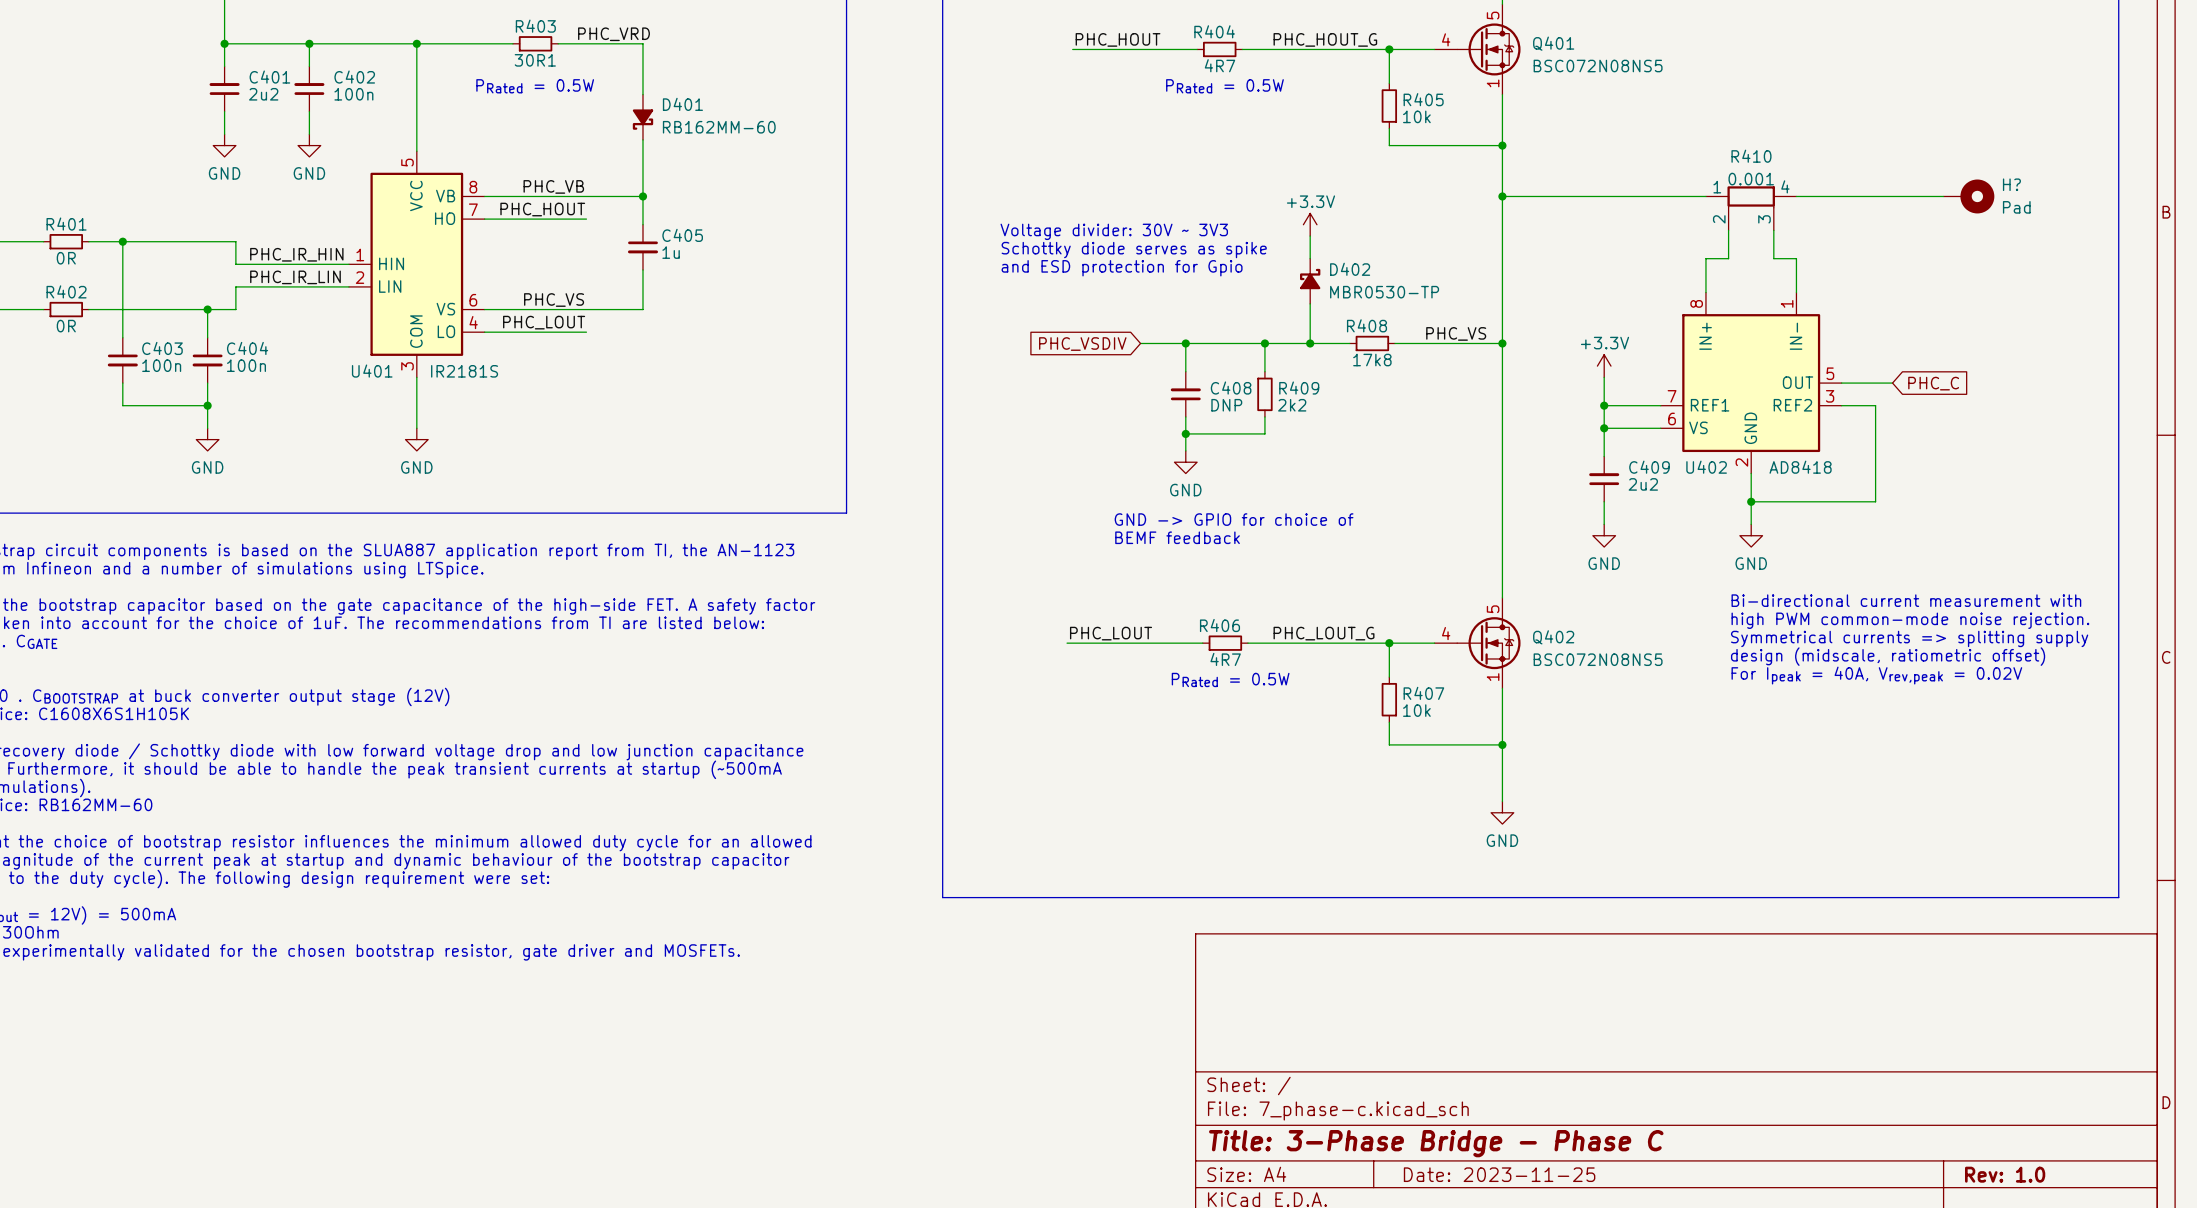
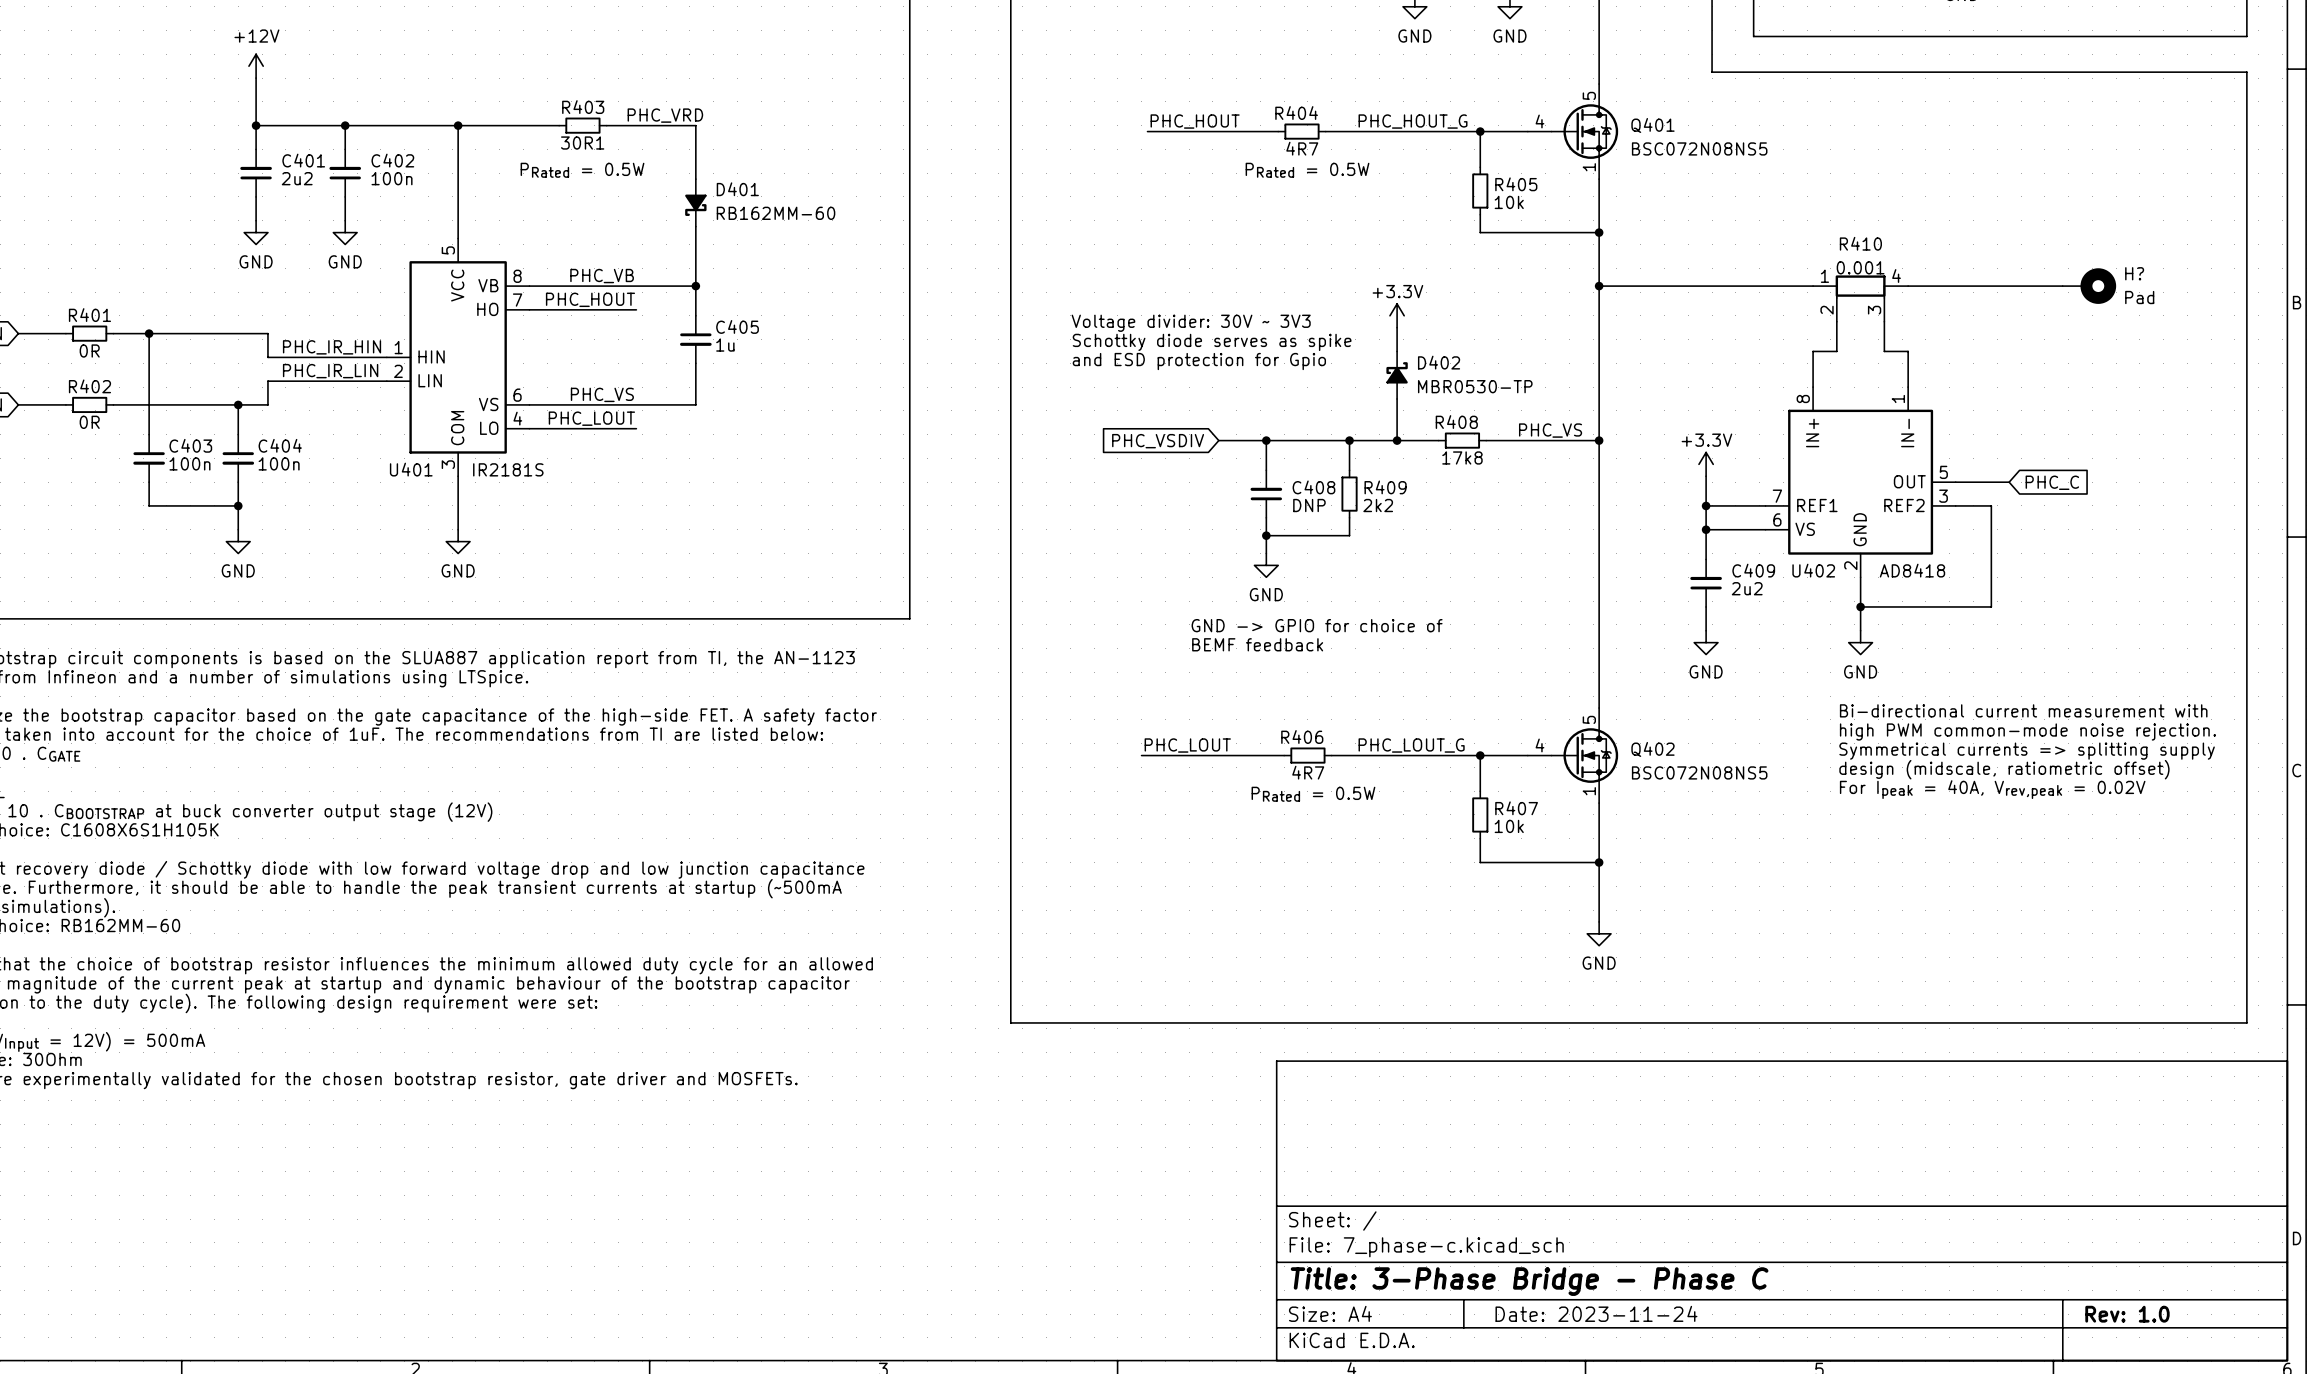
title block: Date: 2023-11-25 (1499, 1174) -> Date: 2023-11-24 (1596, 1313)

